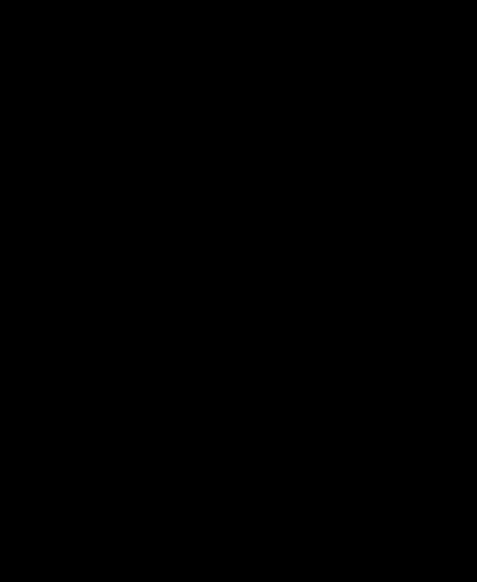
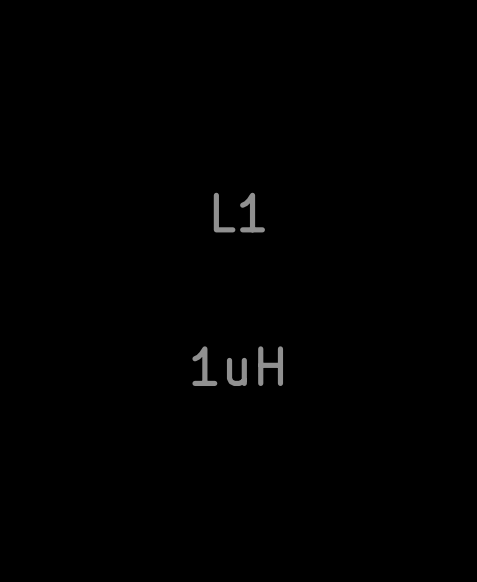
L1: none -> 1uH (237, 289)

